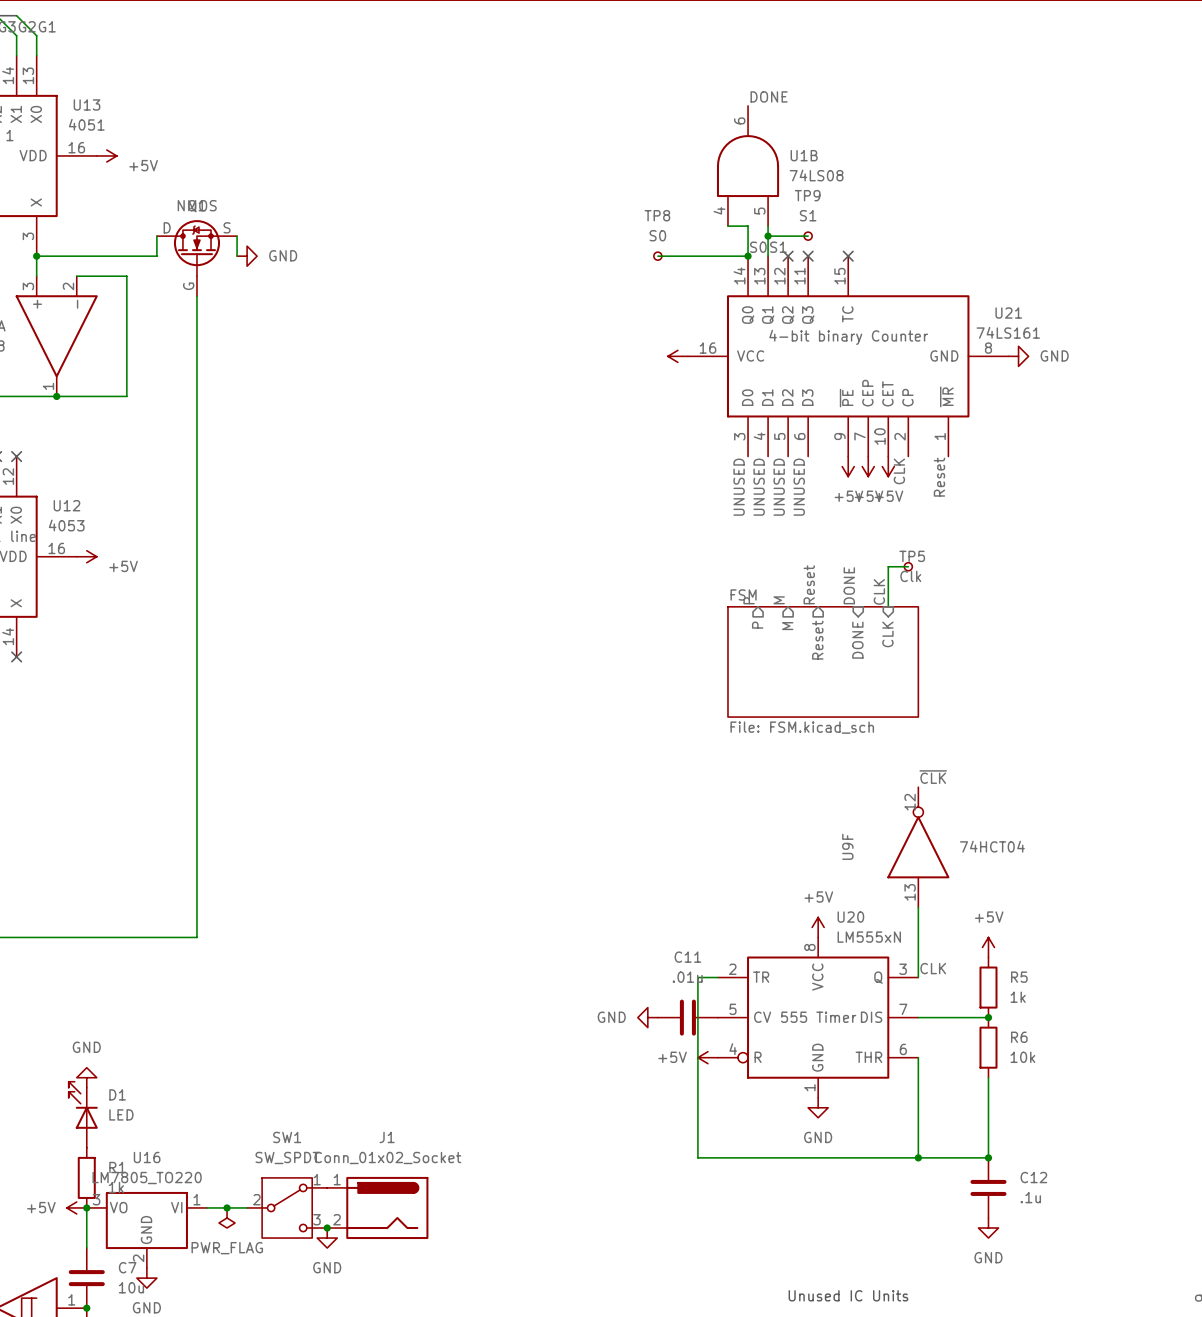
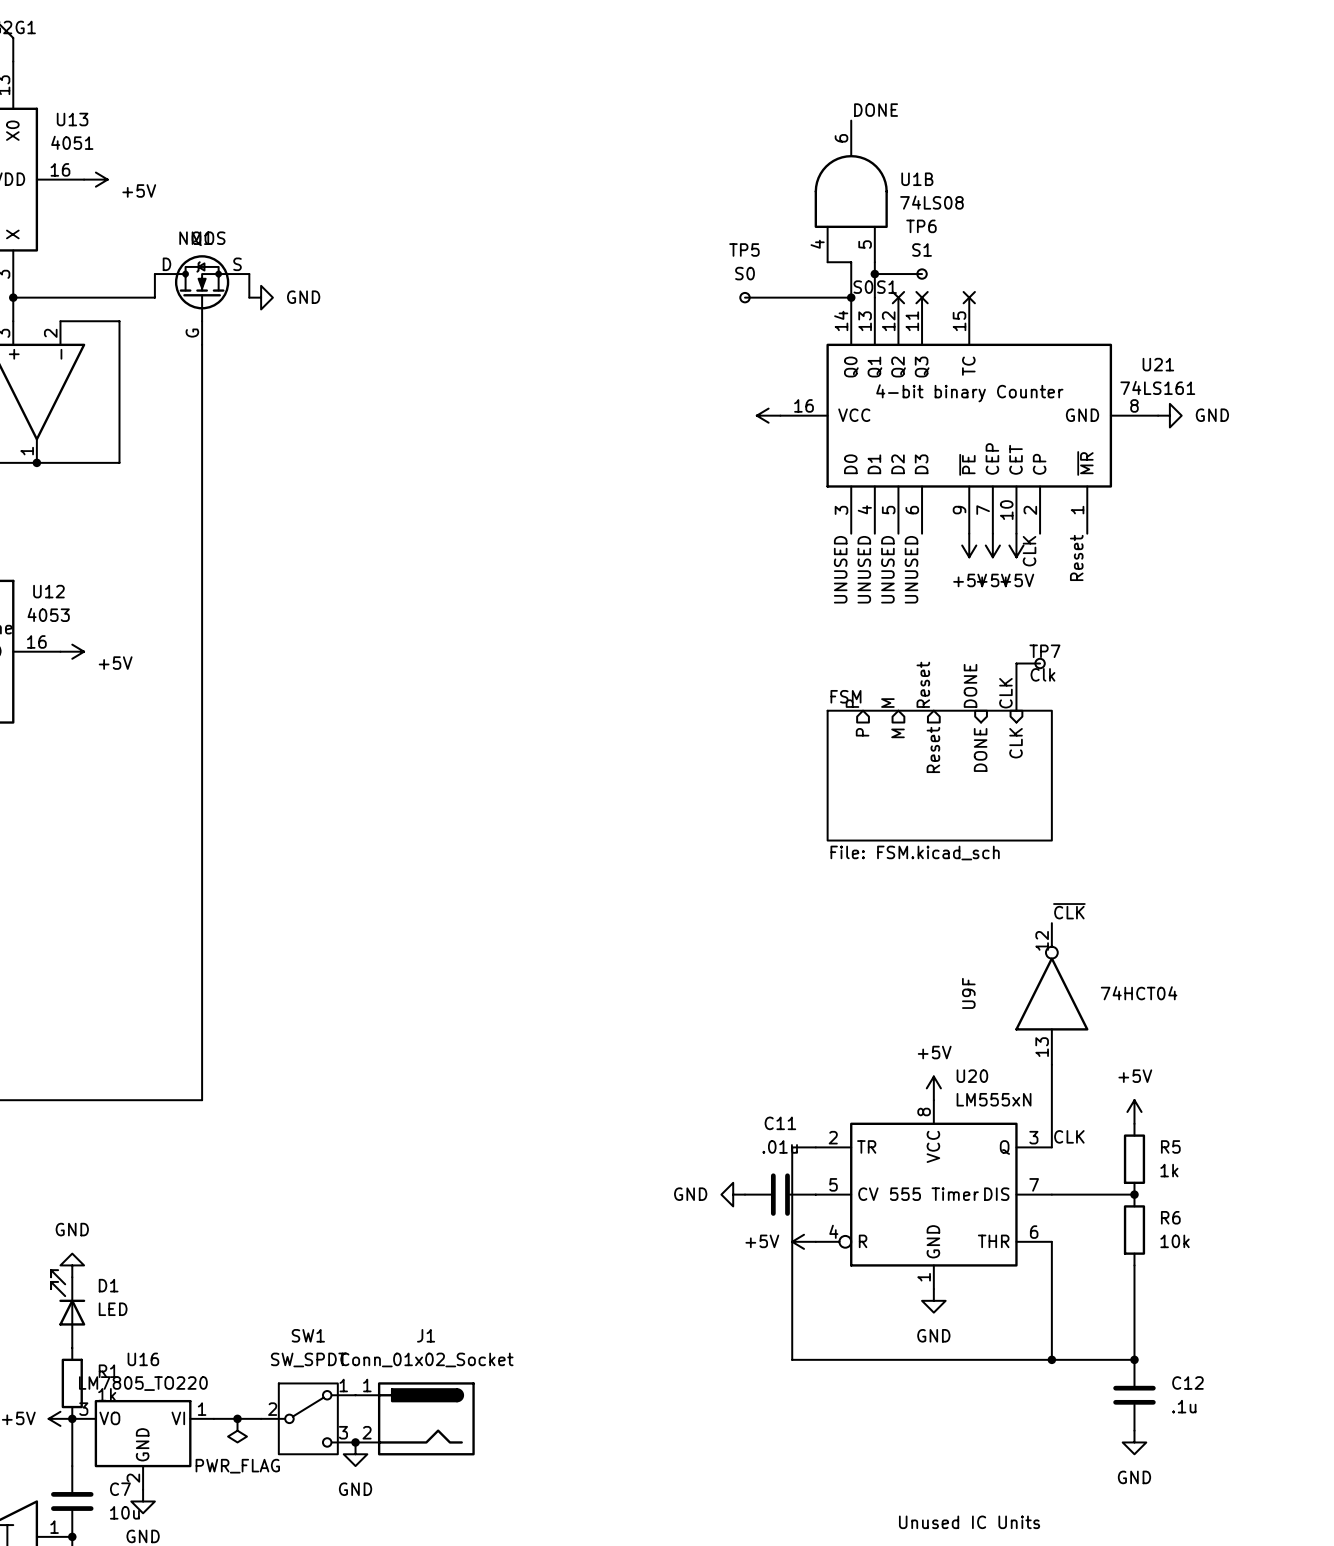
TP9 name: TP9 (807, 195) -> TP6 (921, 226)
TP8 name: TP8 (657, 215) -> TP5 (744, 249)
TP5 name: TP5 (912, 556) -> TP7 (1044, 651)

